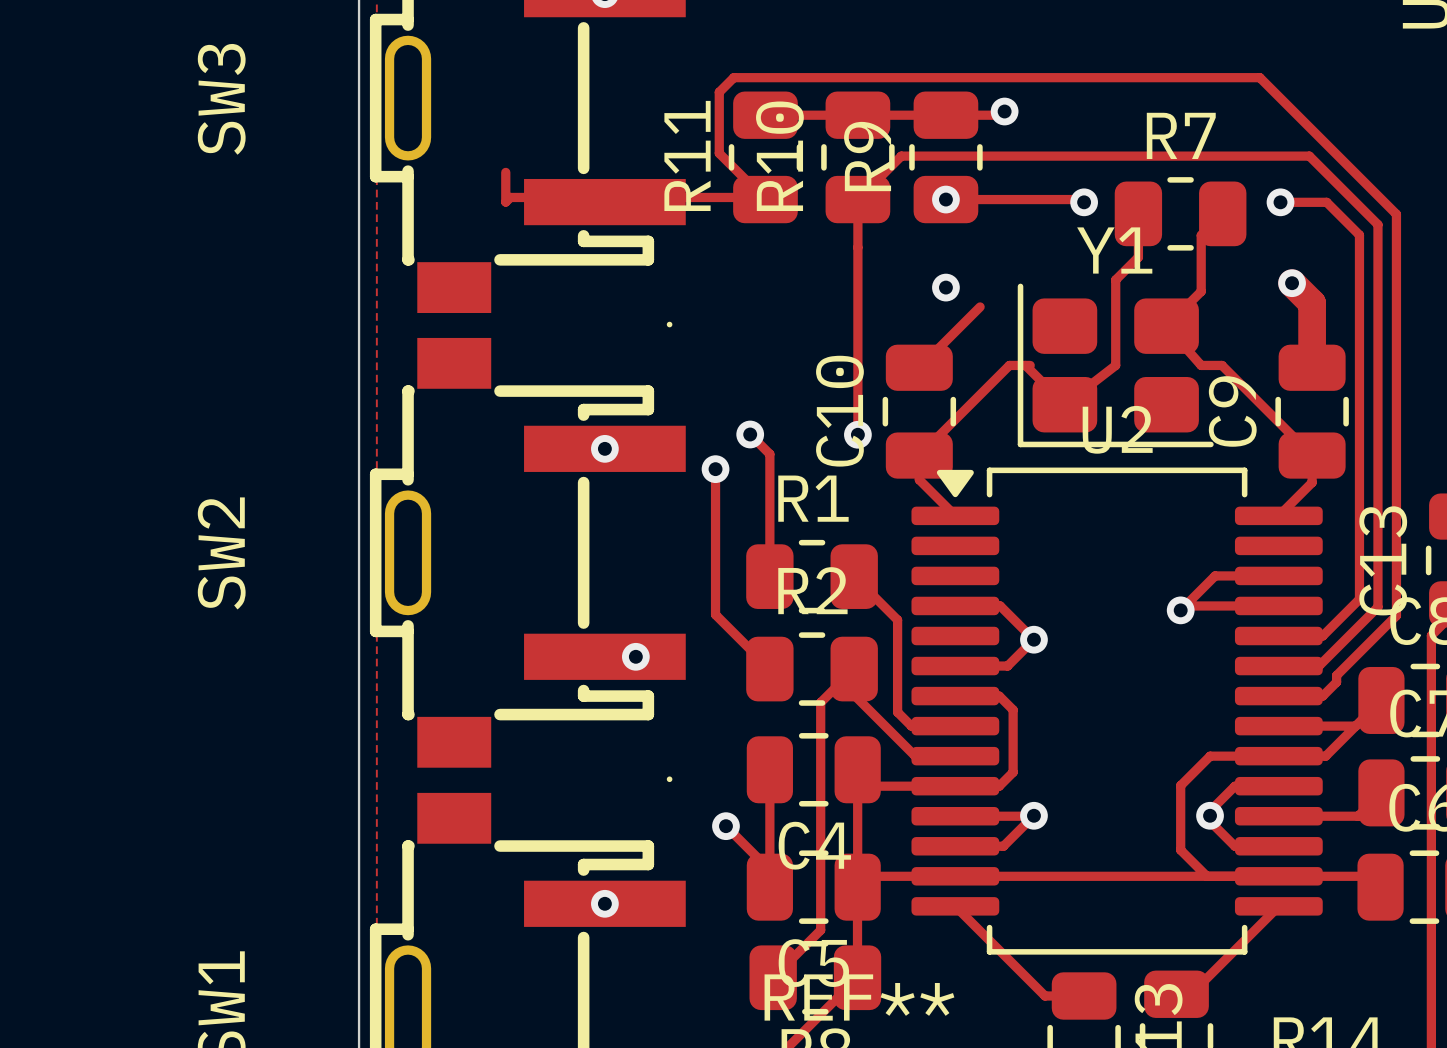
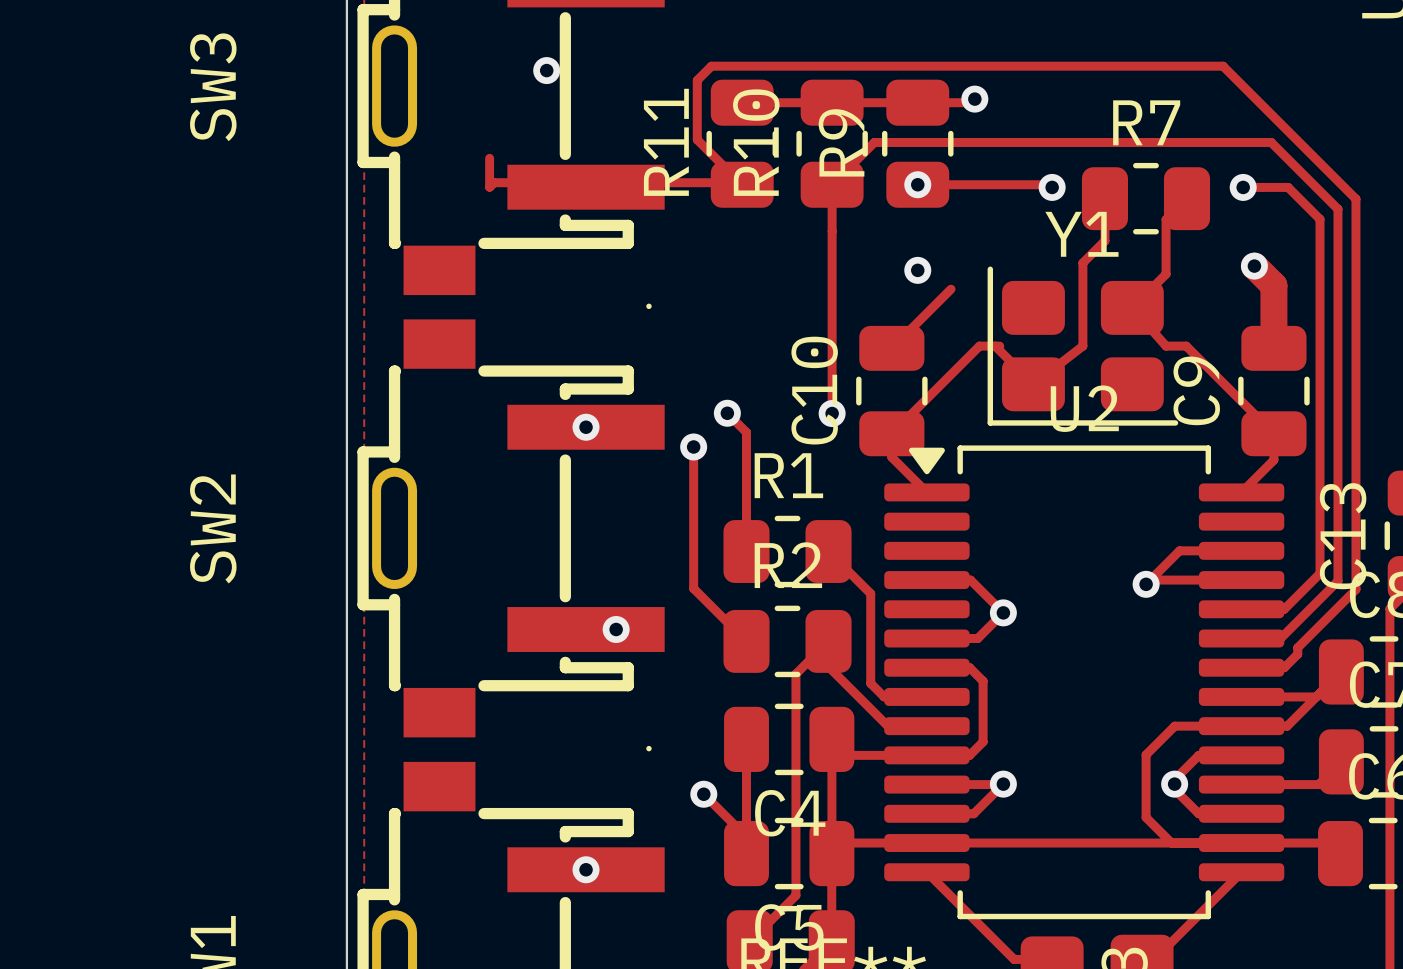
via: none -> (546, 70)

